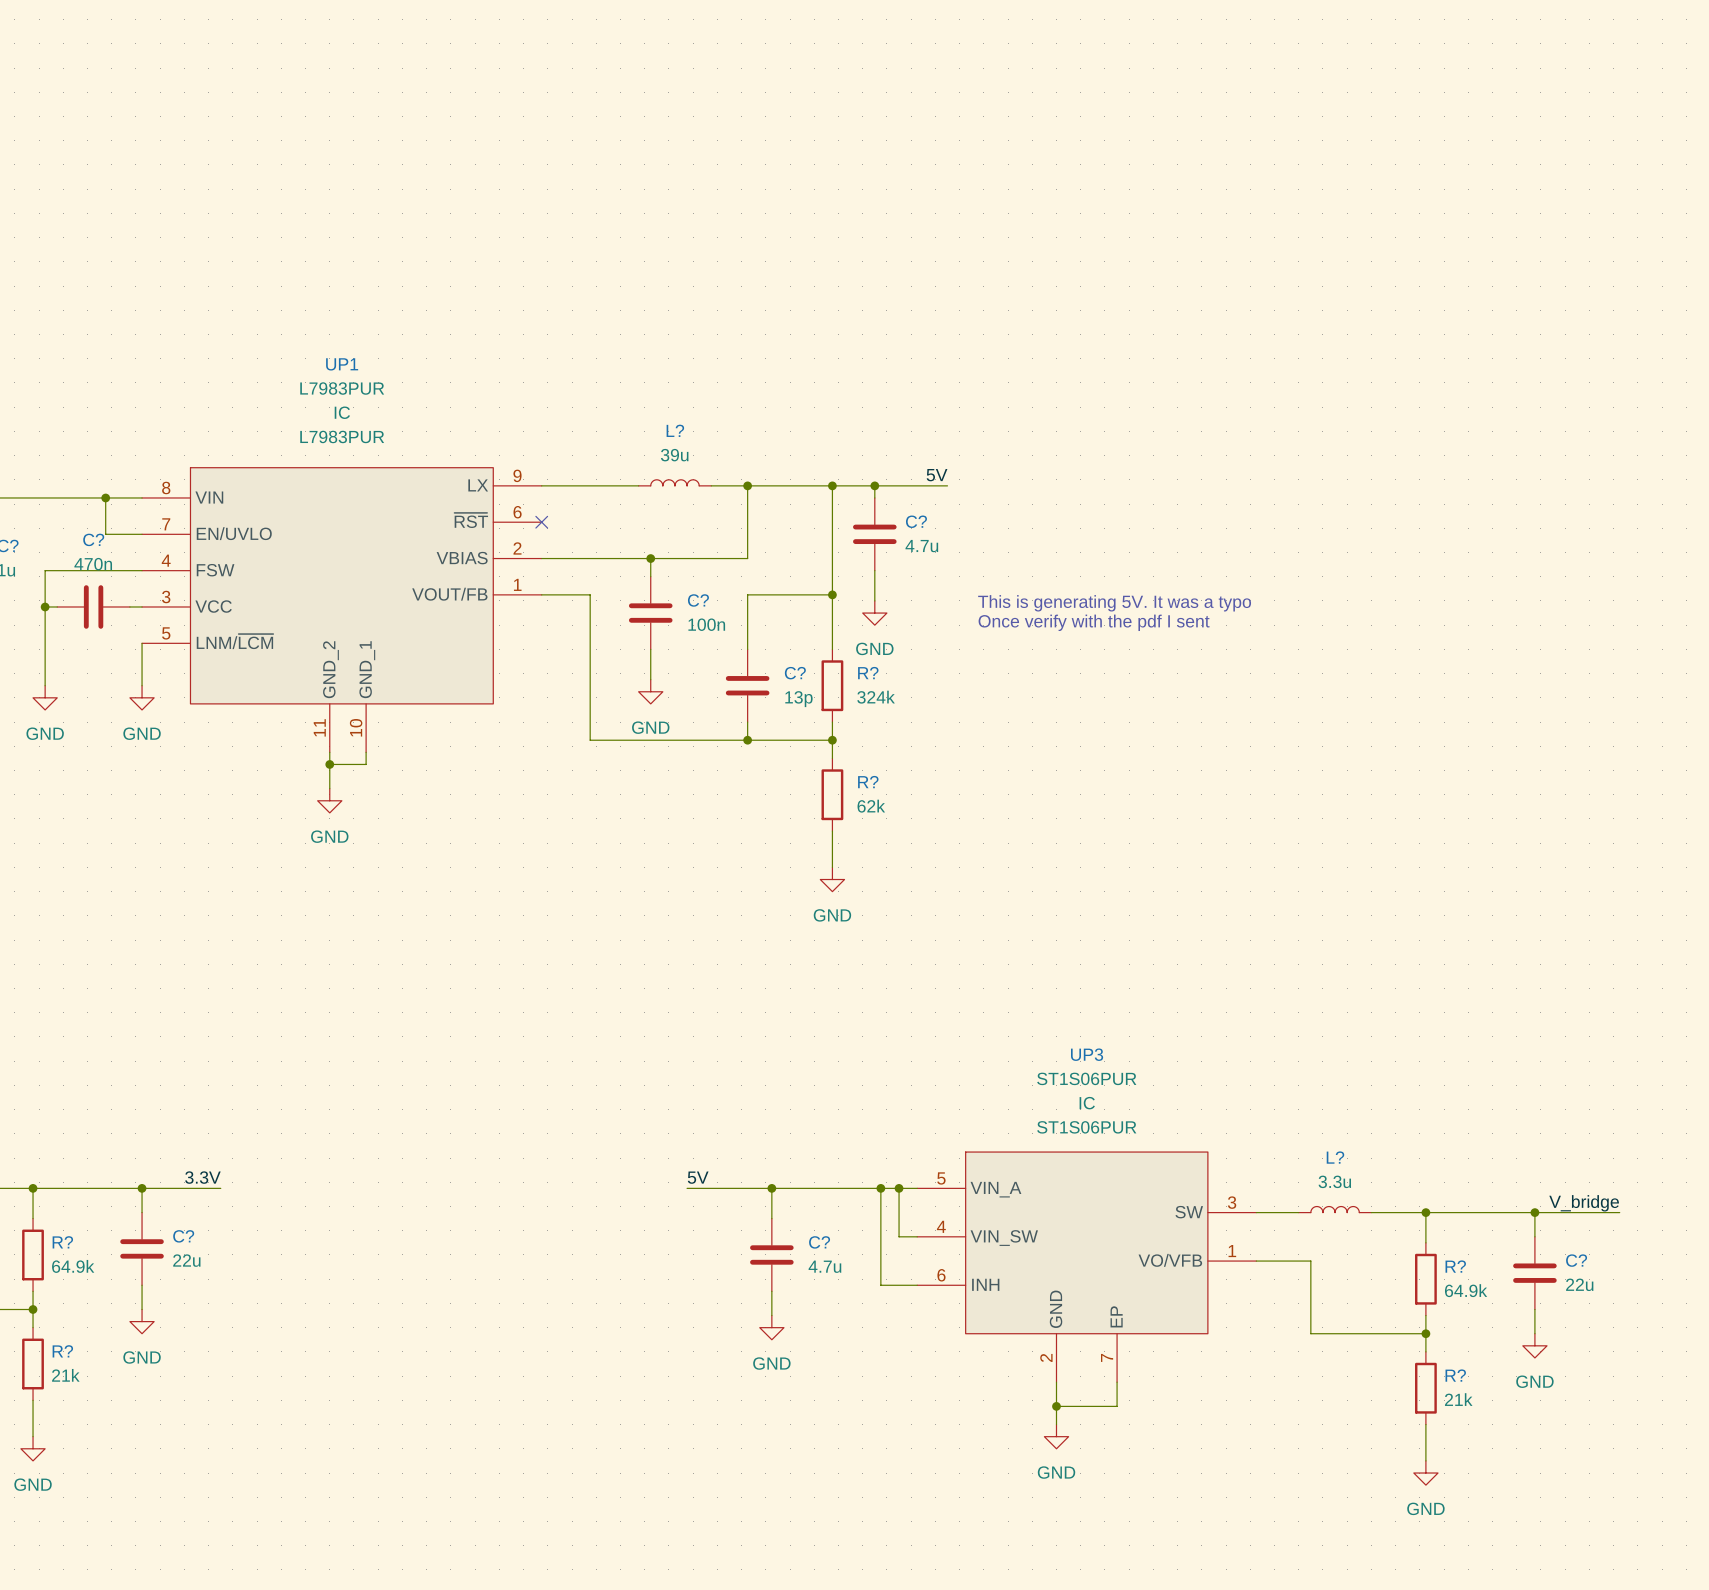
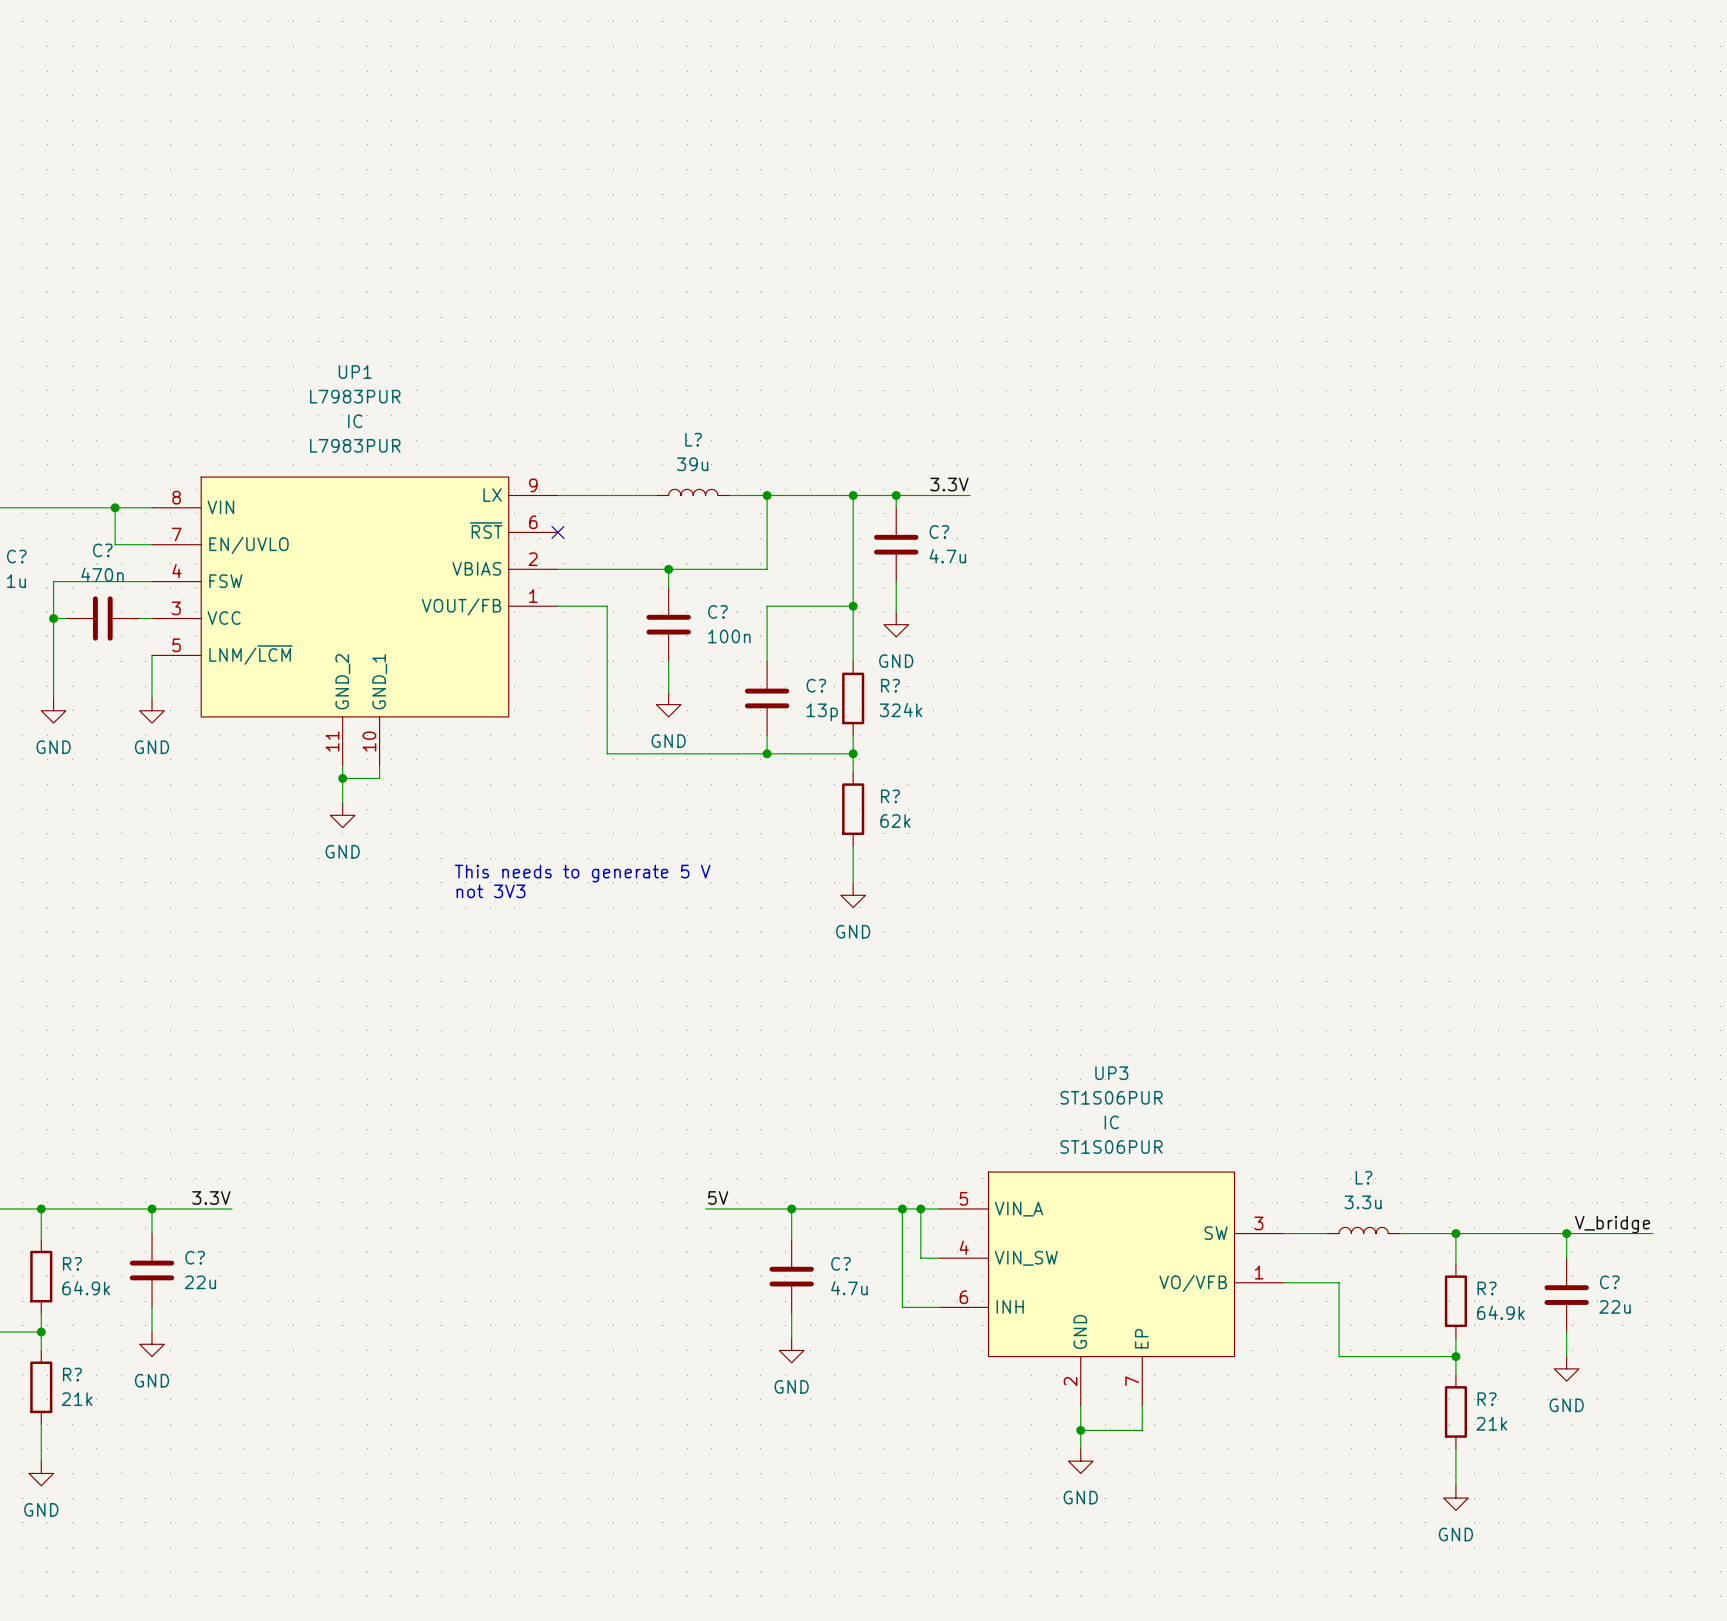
label: 5V (937, 475) -> 3.3V (949, 484)
text: This is generating 5V. It was a typo (1114, 603) -> none
text: Once verify with the pdf I sent (1094, 622) -> none
text: none -> This needs to generate 5 V (582, 873)
text: none -> not 3V3 (490, 891)

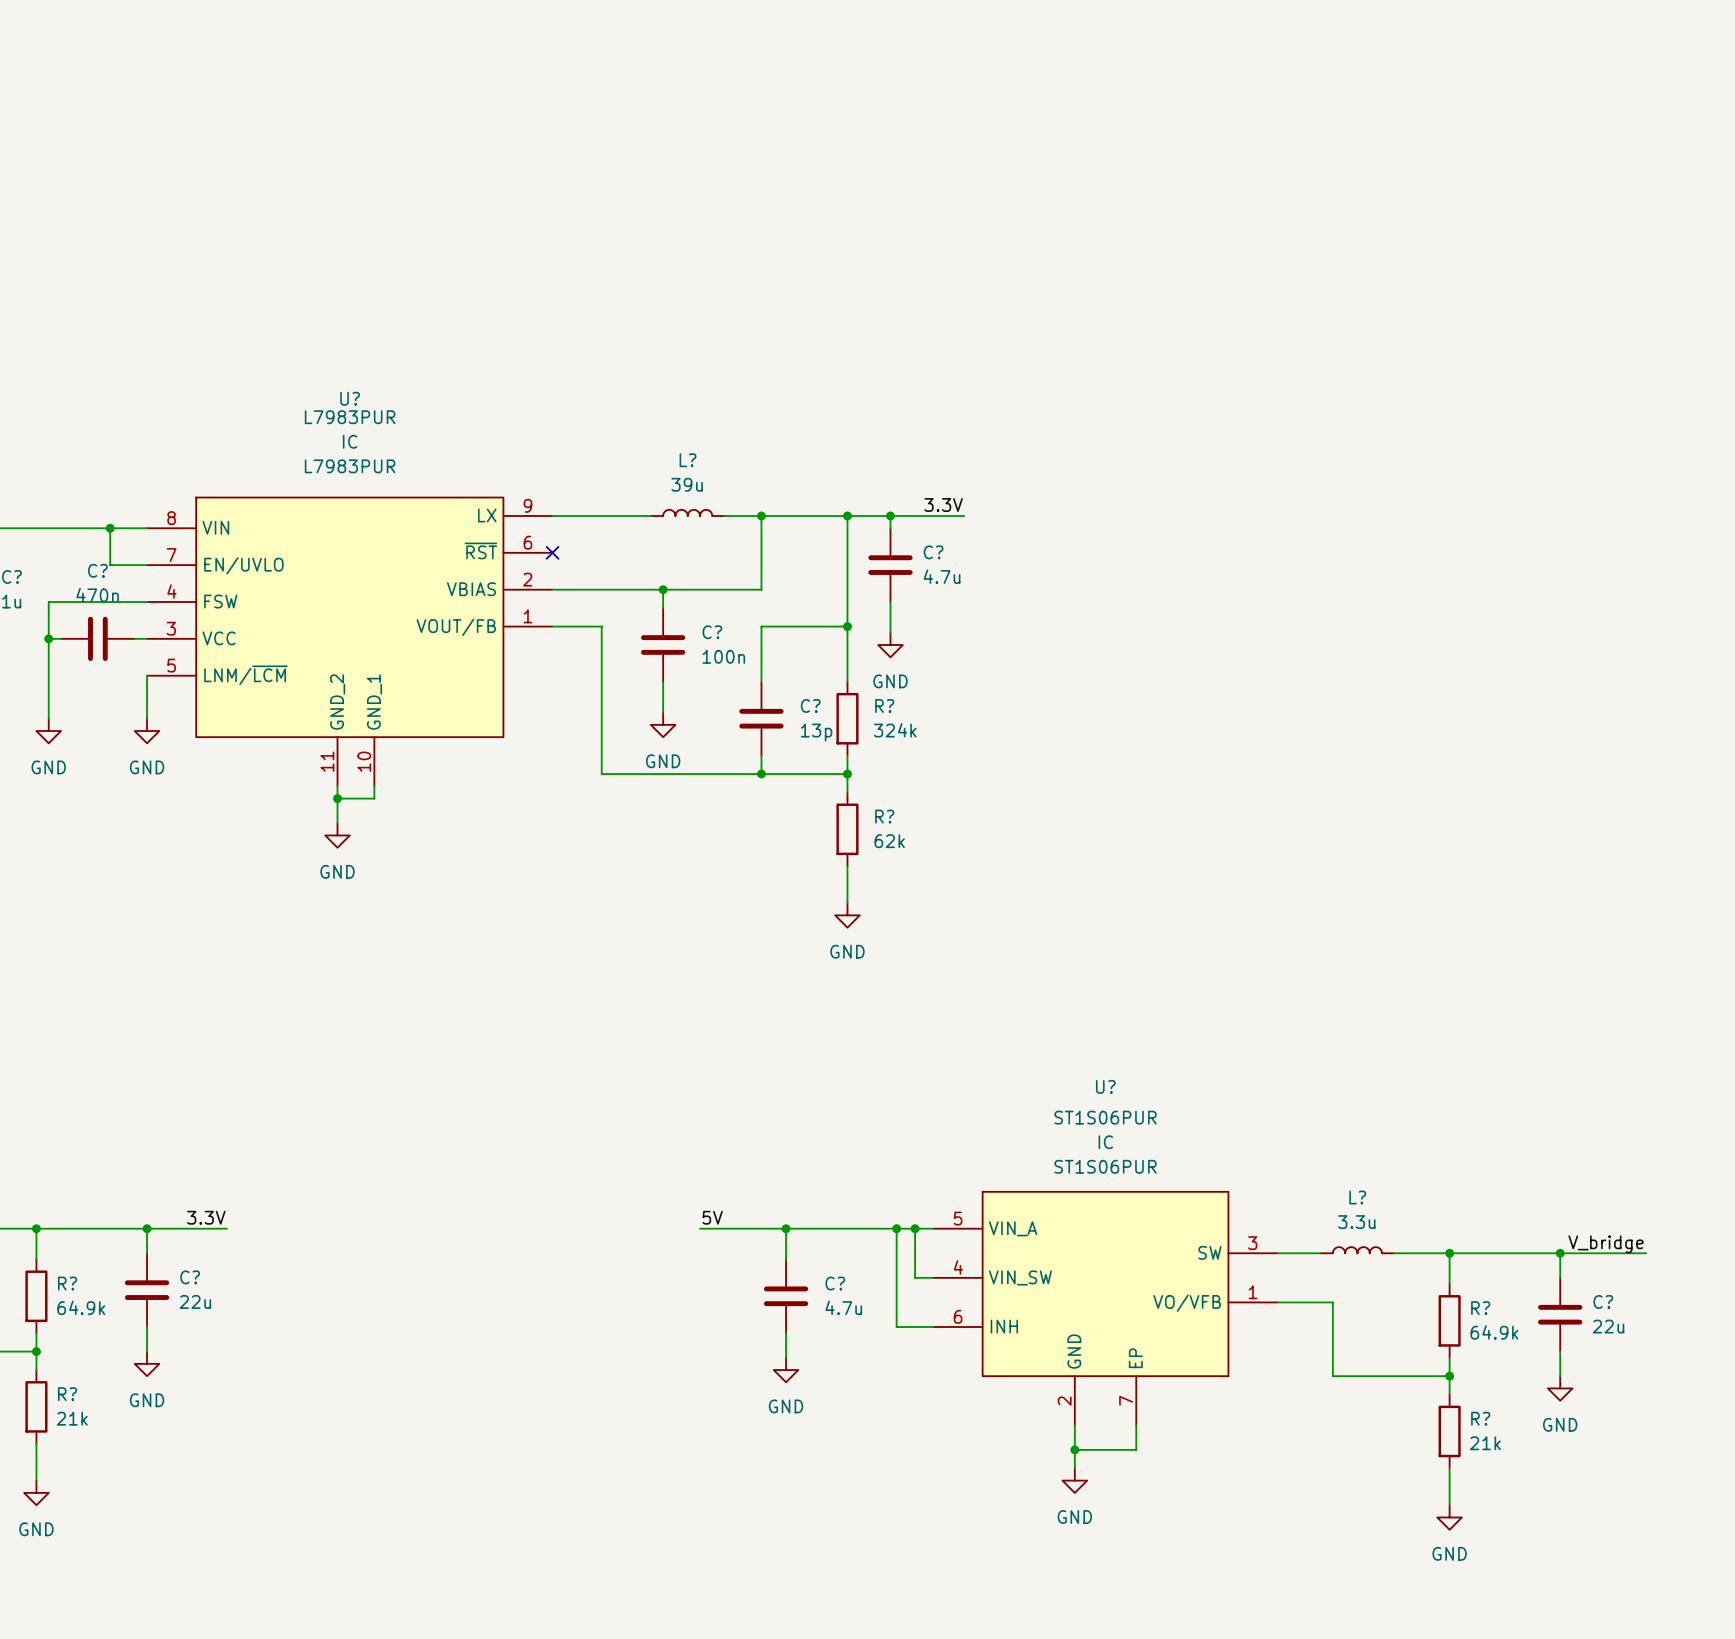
UP1 name: UP1 (355, 372) -> U? (350, 398)
text: This needs to generate 5 V (582, 873) -> none
text: not 3V3 (490, 891) -> none
UP3 name: UP3 (1111, 1073) -> U? (1105, 1086)

